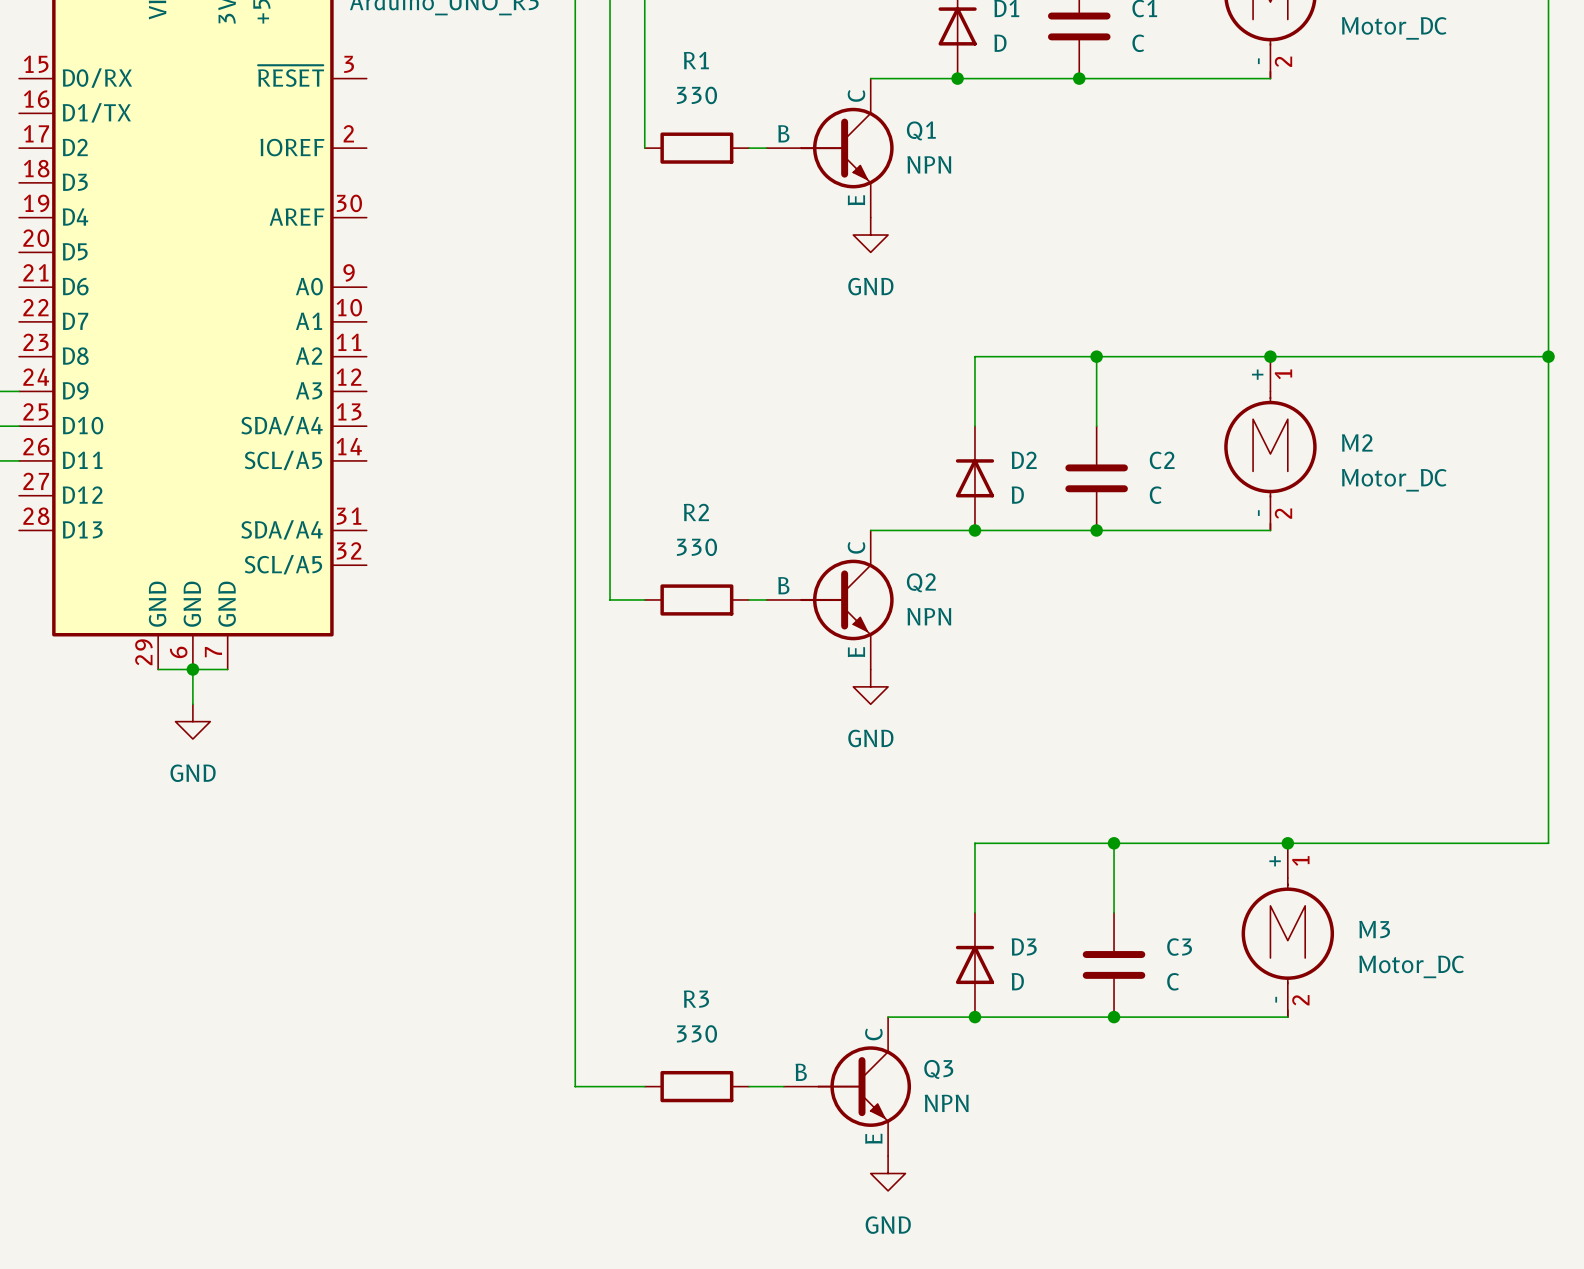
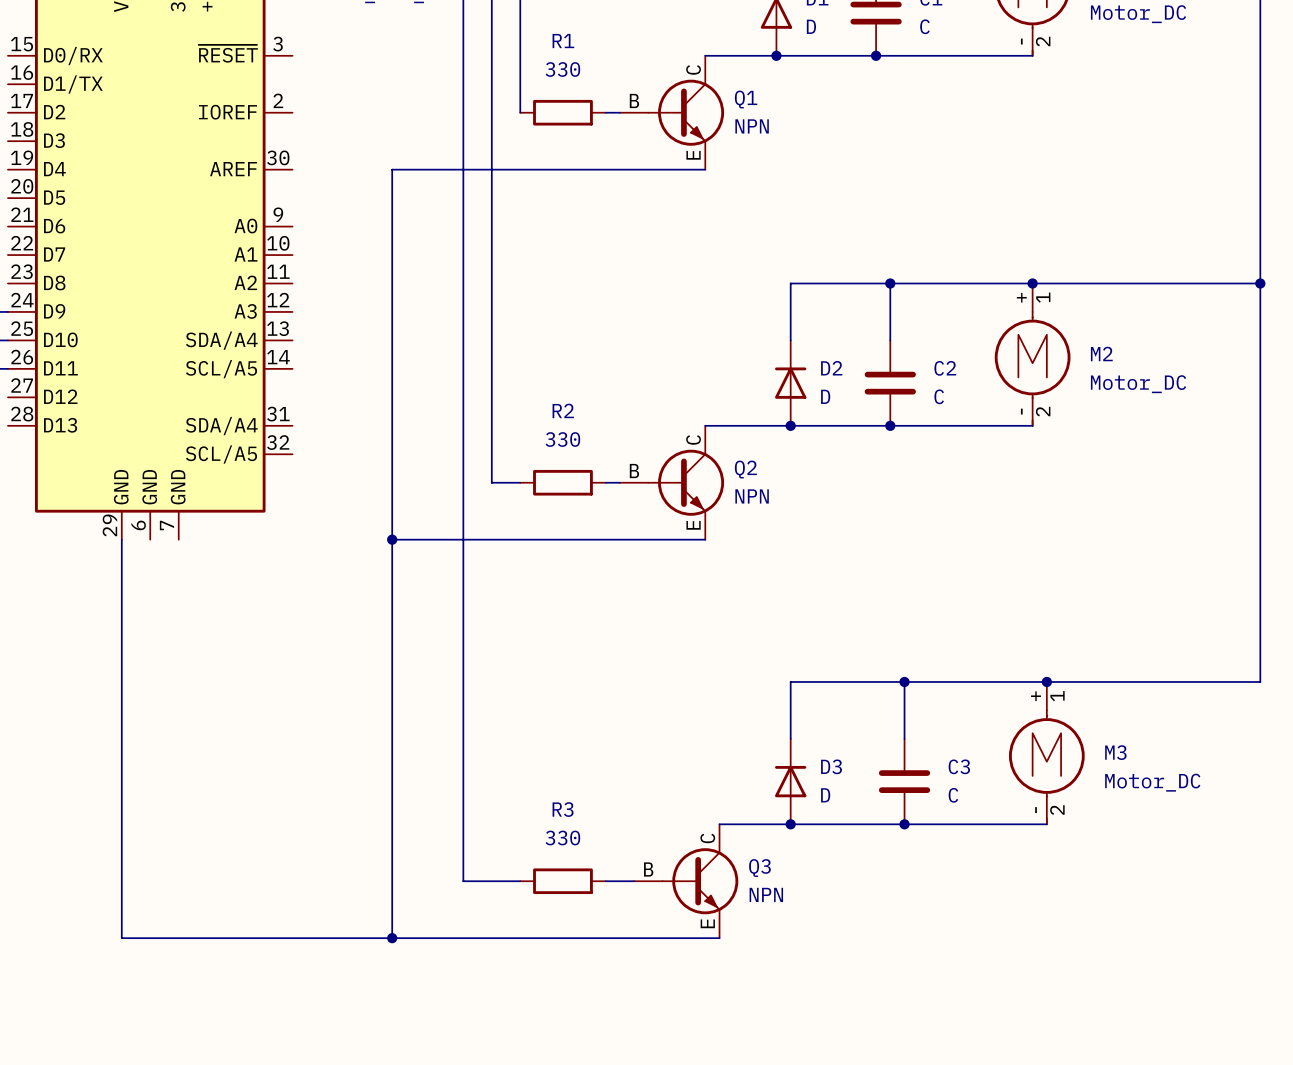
wire: none -> (705, 169) (392, 169) (392, 938)
power symbol: GND (870, 235) -> none
wire: (158, 669) (227, 669) -> (121, 539) (121, 938) (719, 938)
wire: (192, 669) (192, 704) -> none
junction: (192, 669) -> none
wire: none -> (392, 539) (705, 539)
junction: none -> (392, 539)
power symbol: GND (870, 686) -> none
power symbol: GND (192, 721) -> none
junction: none -> (392, 938)
power symbol: GND (888, 1173) -> none

